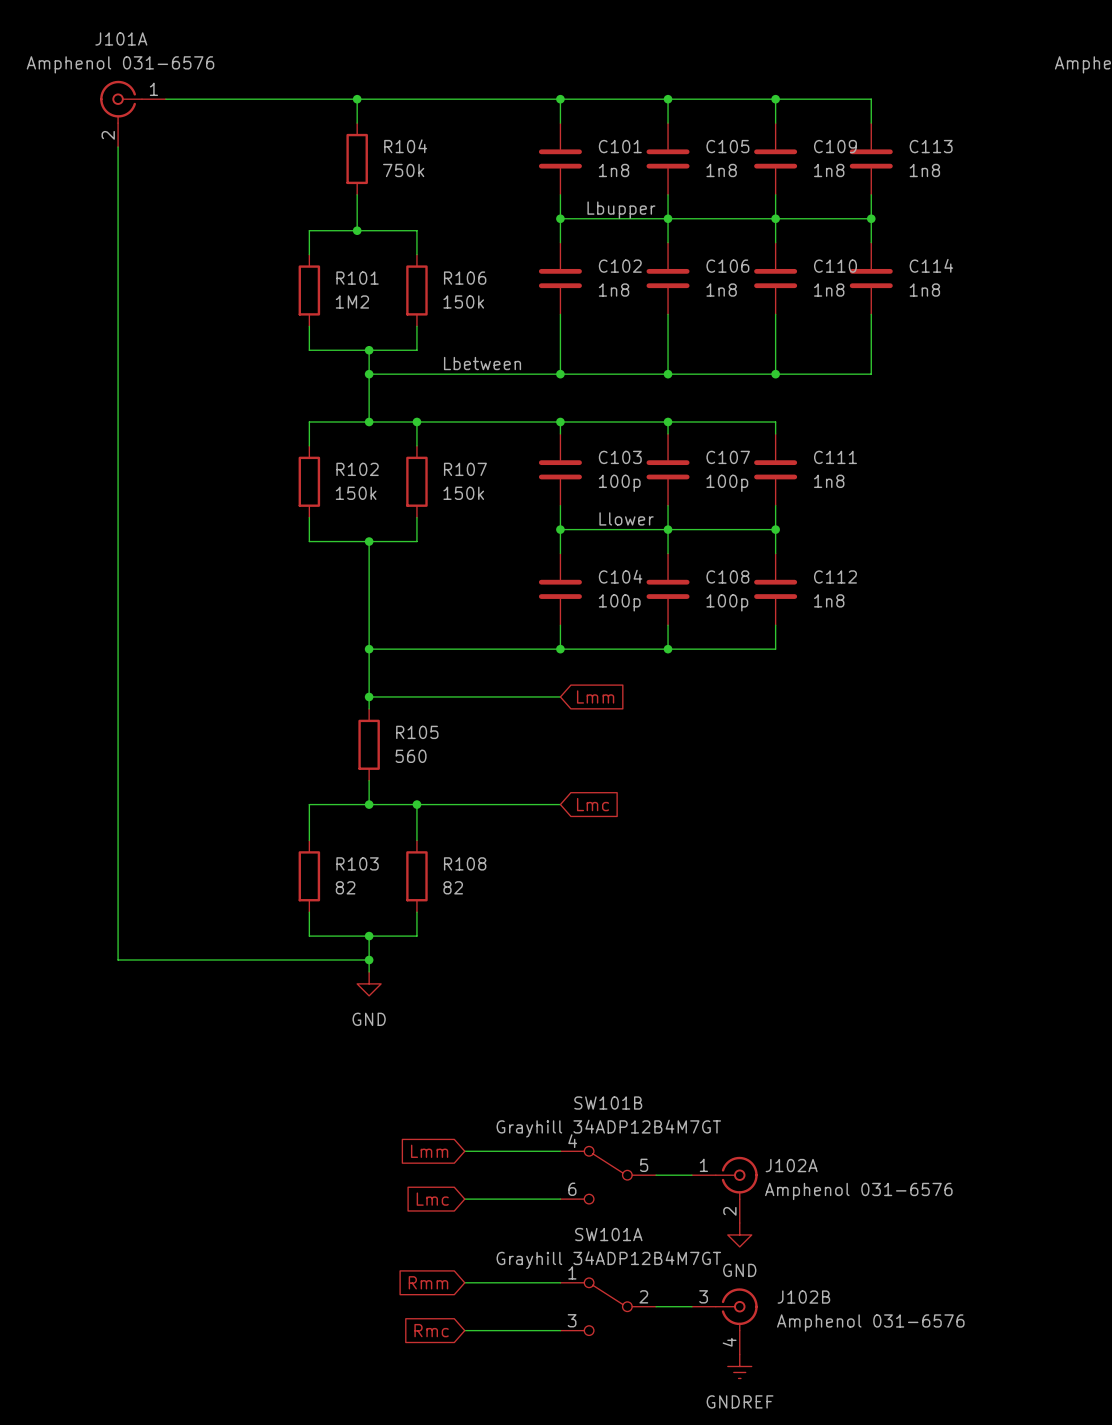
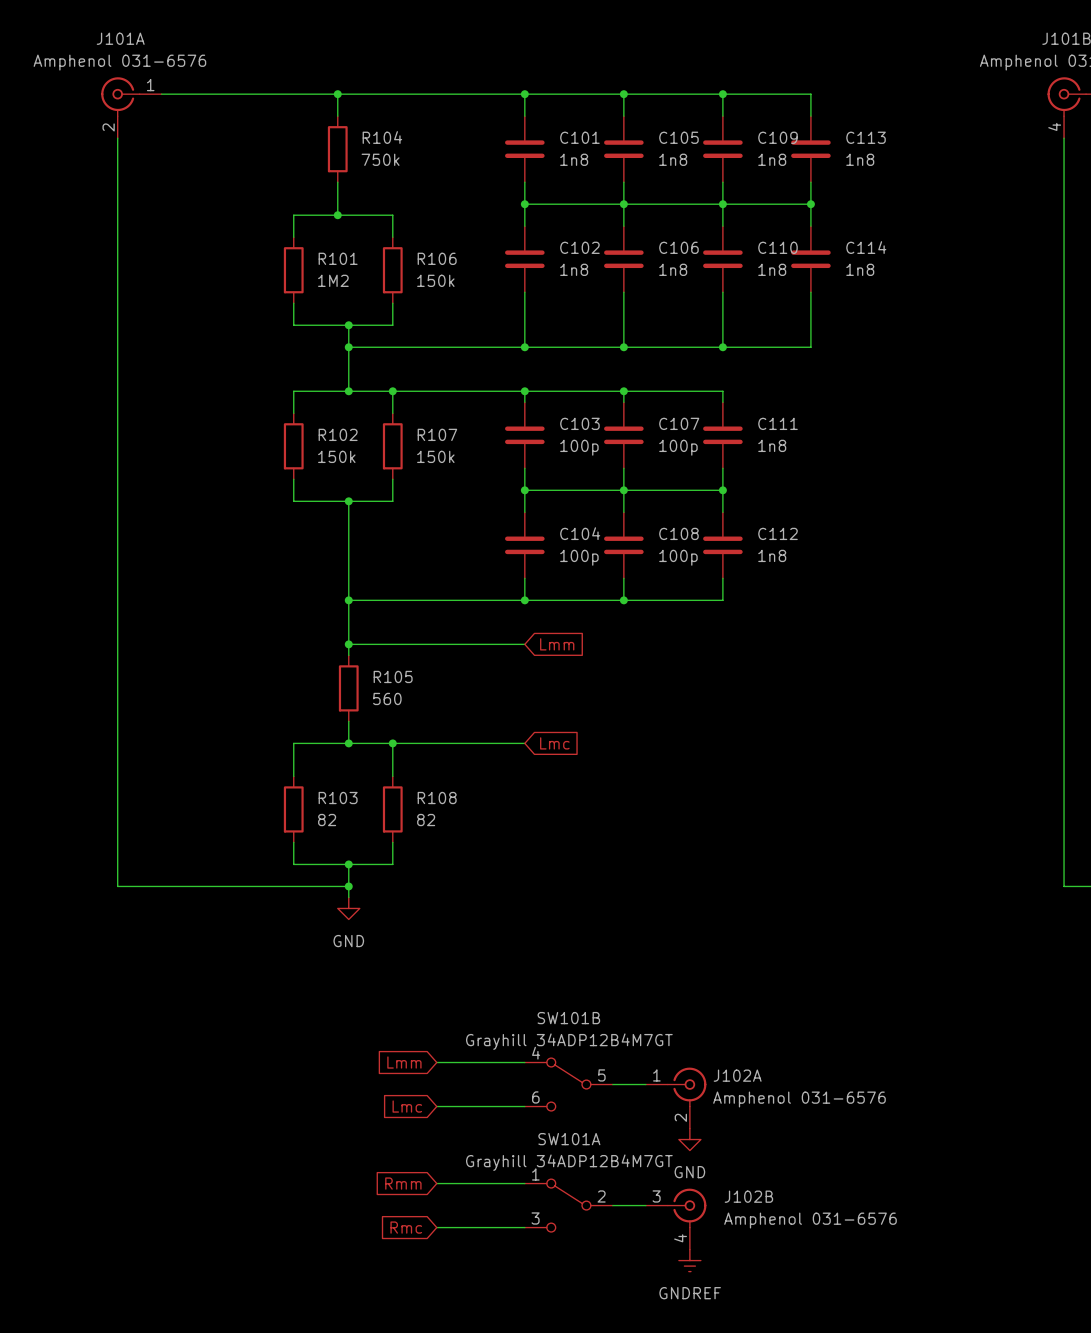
label: Lbupper (621, 210) -> none
label: Lbetween (482, 363) -> none
label: Llower (626, 518) -> none

